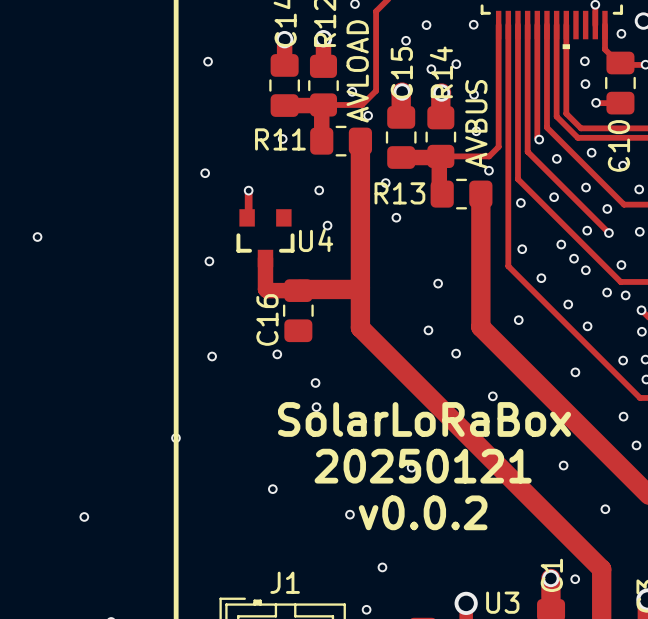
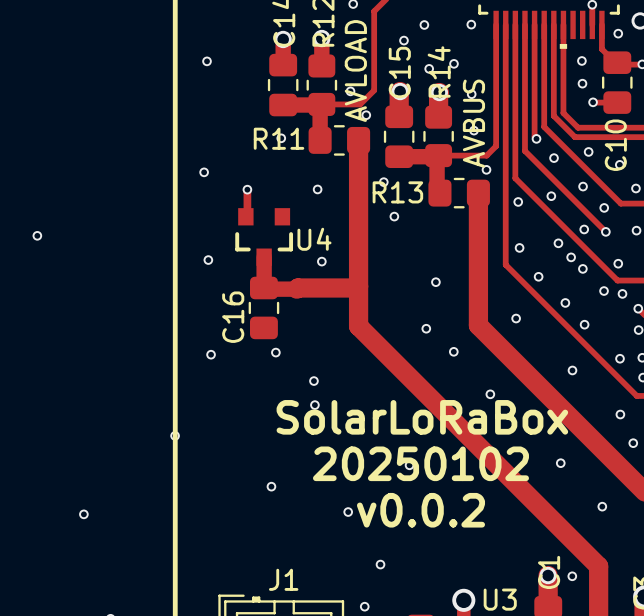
via position: (327, 225) -> (321, 261)
C16 position: (298, 310) -> (263, 307)
text: 20250121 (423, 466) -> 20250102 (420, 463)

